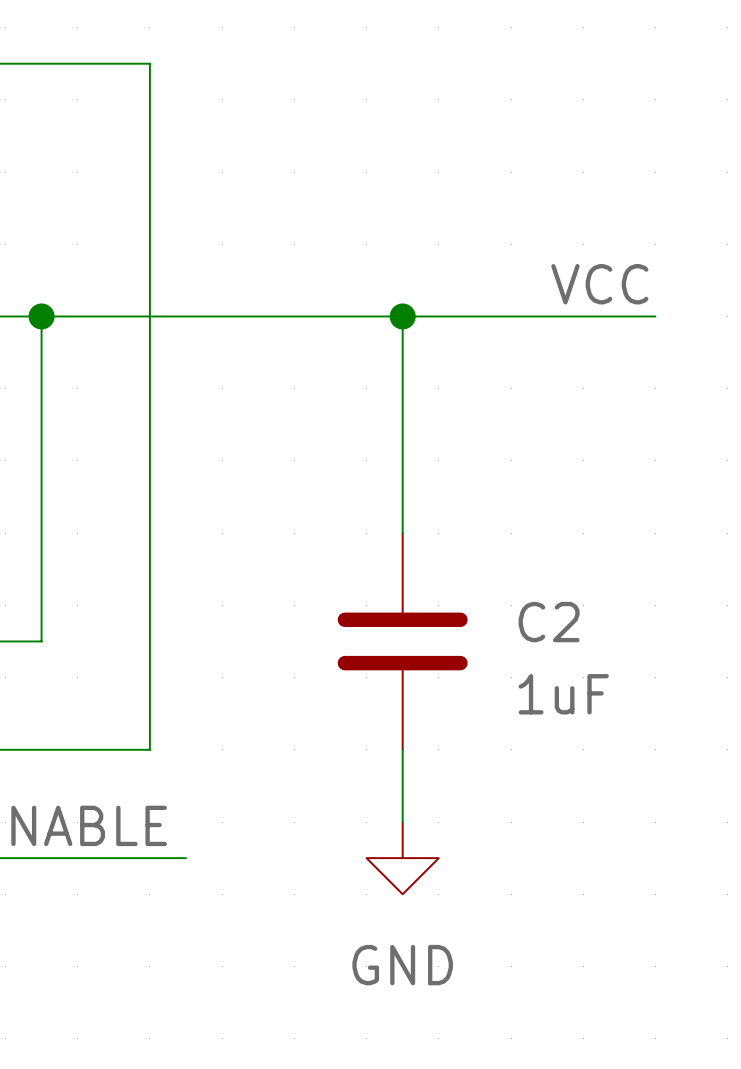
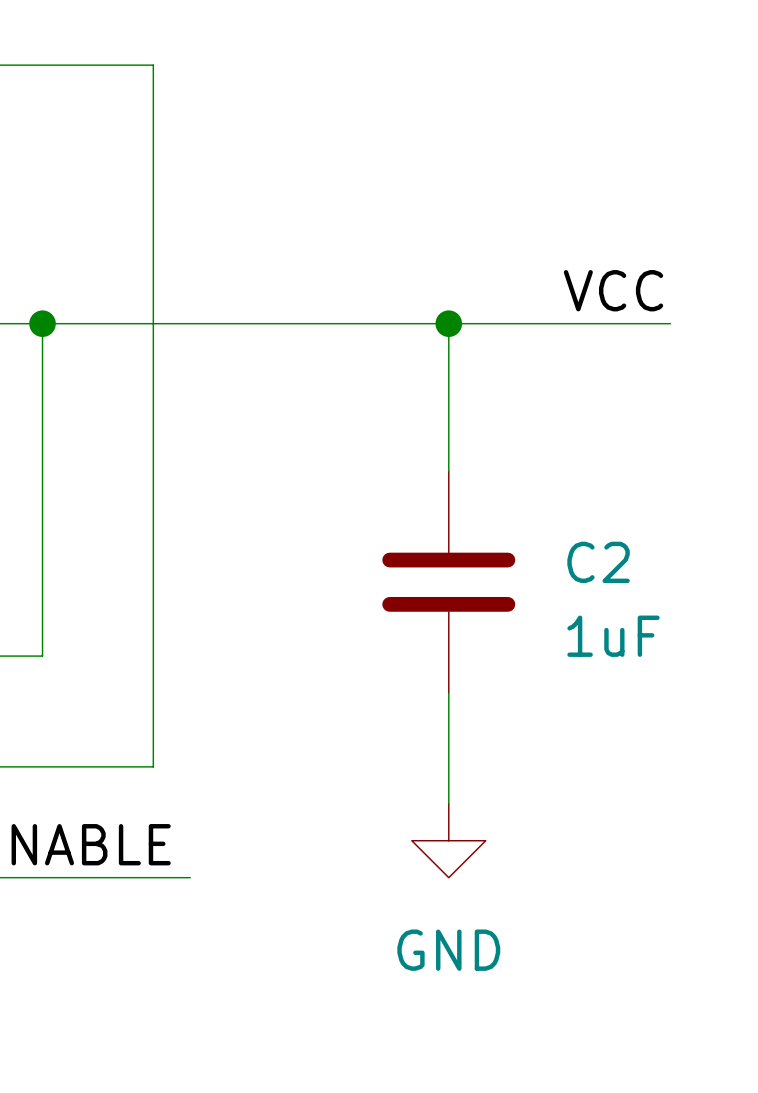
wire: (402, 316) (402, 533) -> none
junction position: (402, 316) -> (448, 323)
wire: none -> (448, 323) (448, 471)
C2 position: (402, 641) -> (448, 582)
wire: none -> (448, 693) (448, 803)
wire: (402, 749) (402, 822) -> none
power symbol position: GND (402, 858) -> GND (448, 840)

